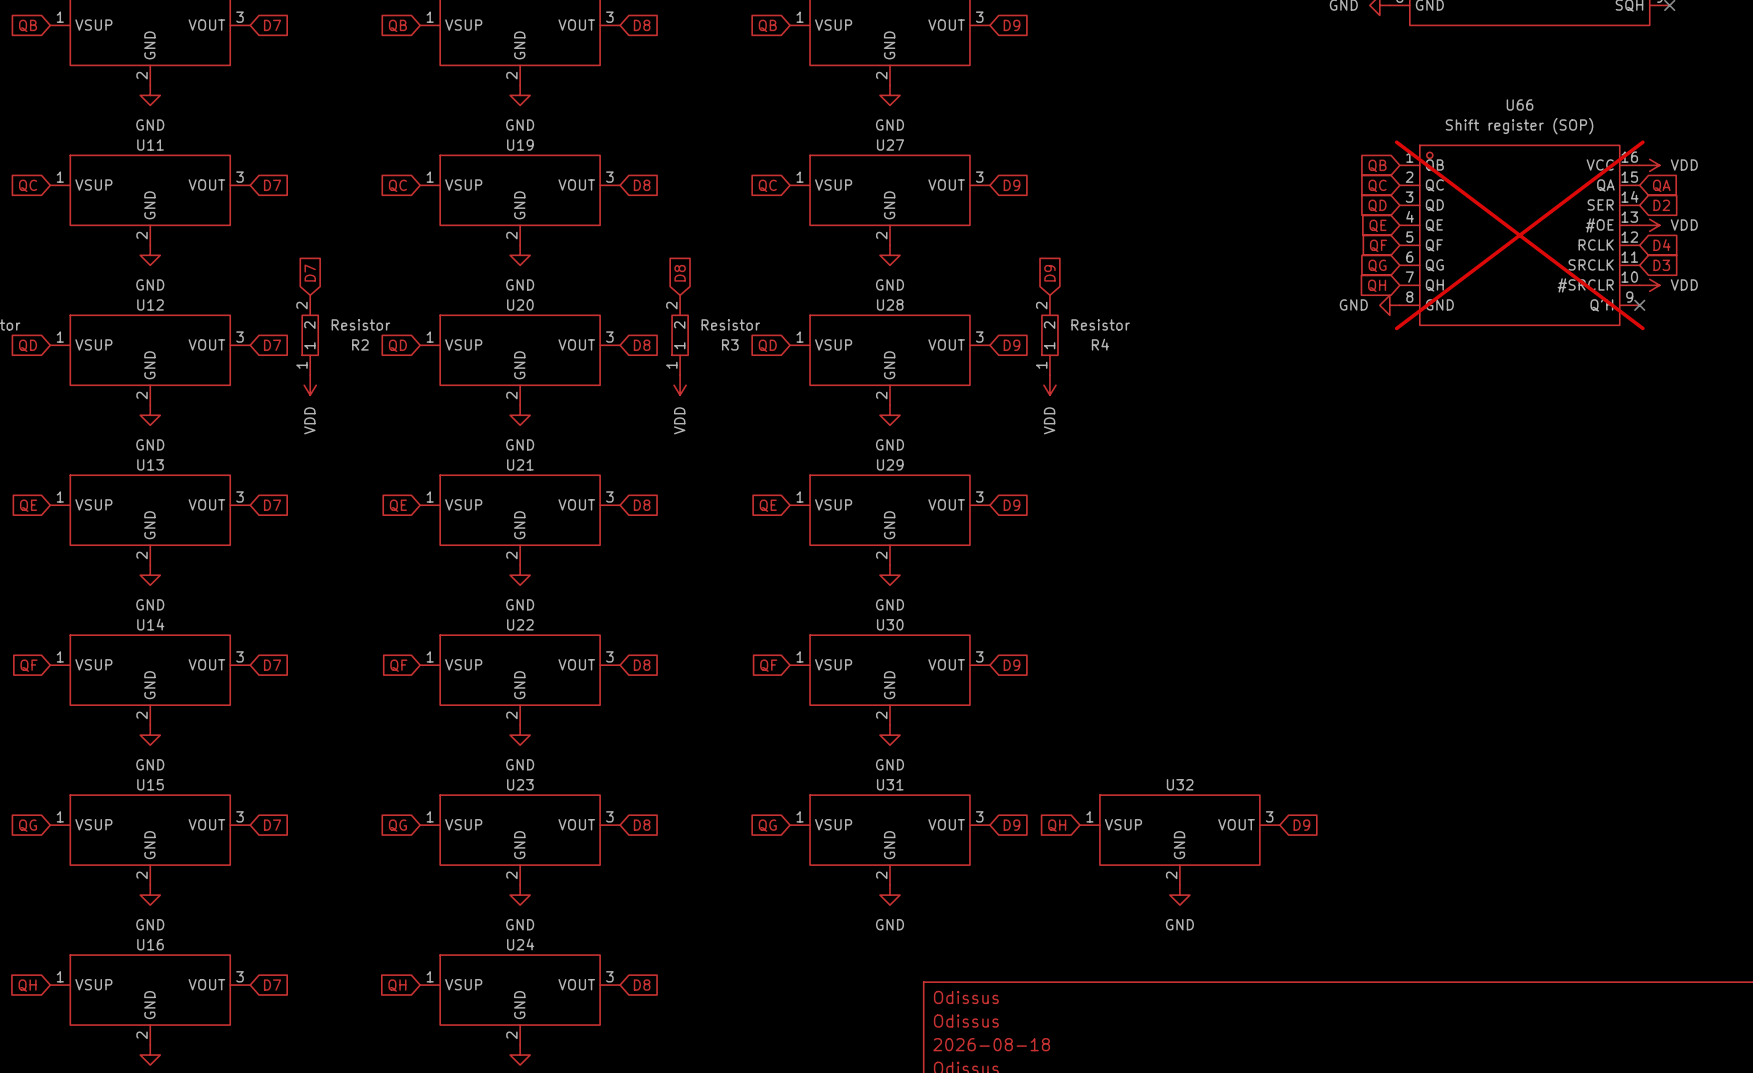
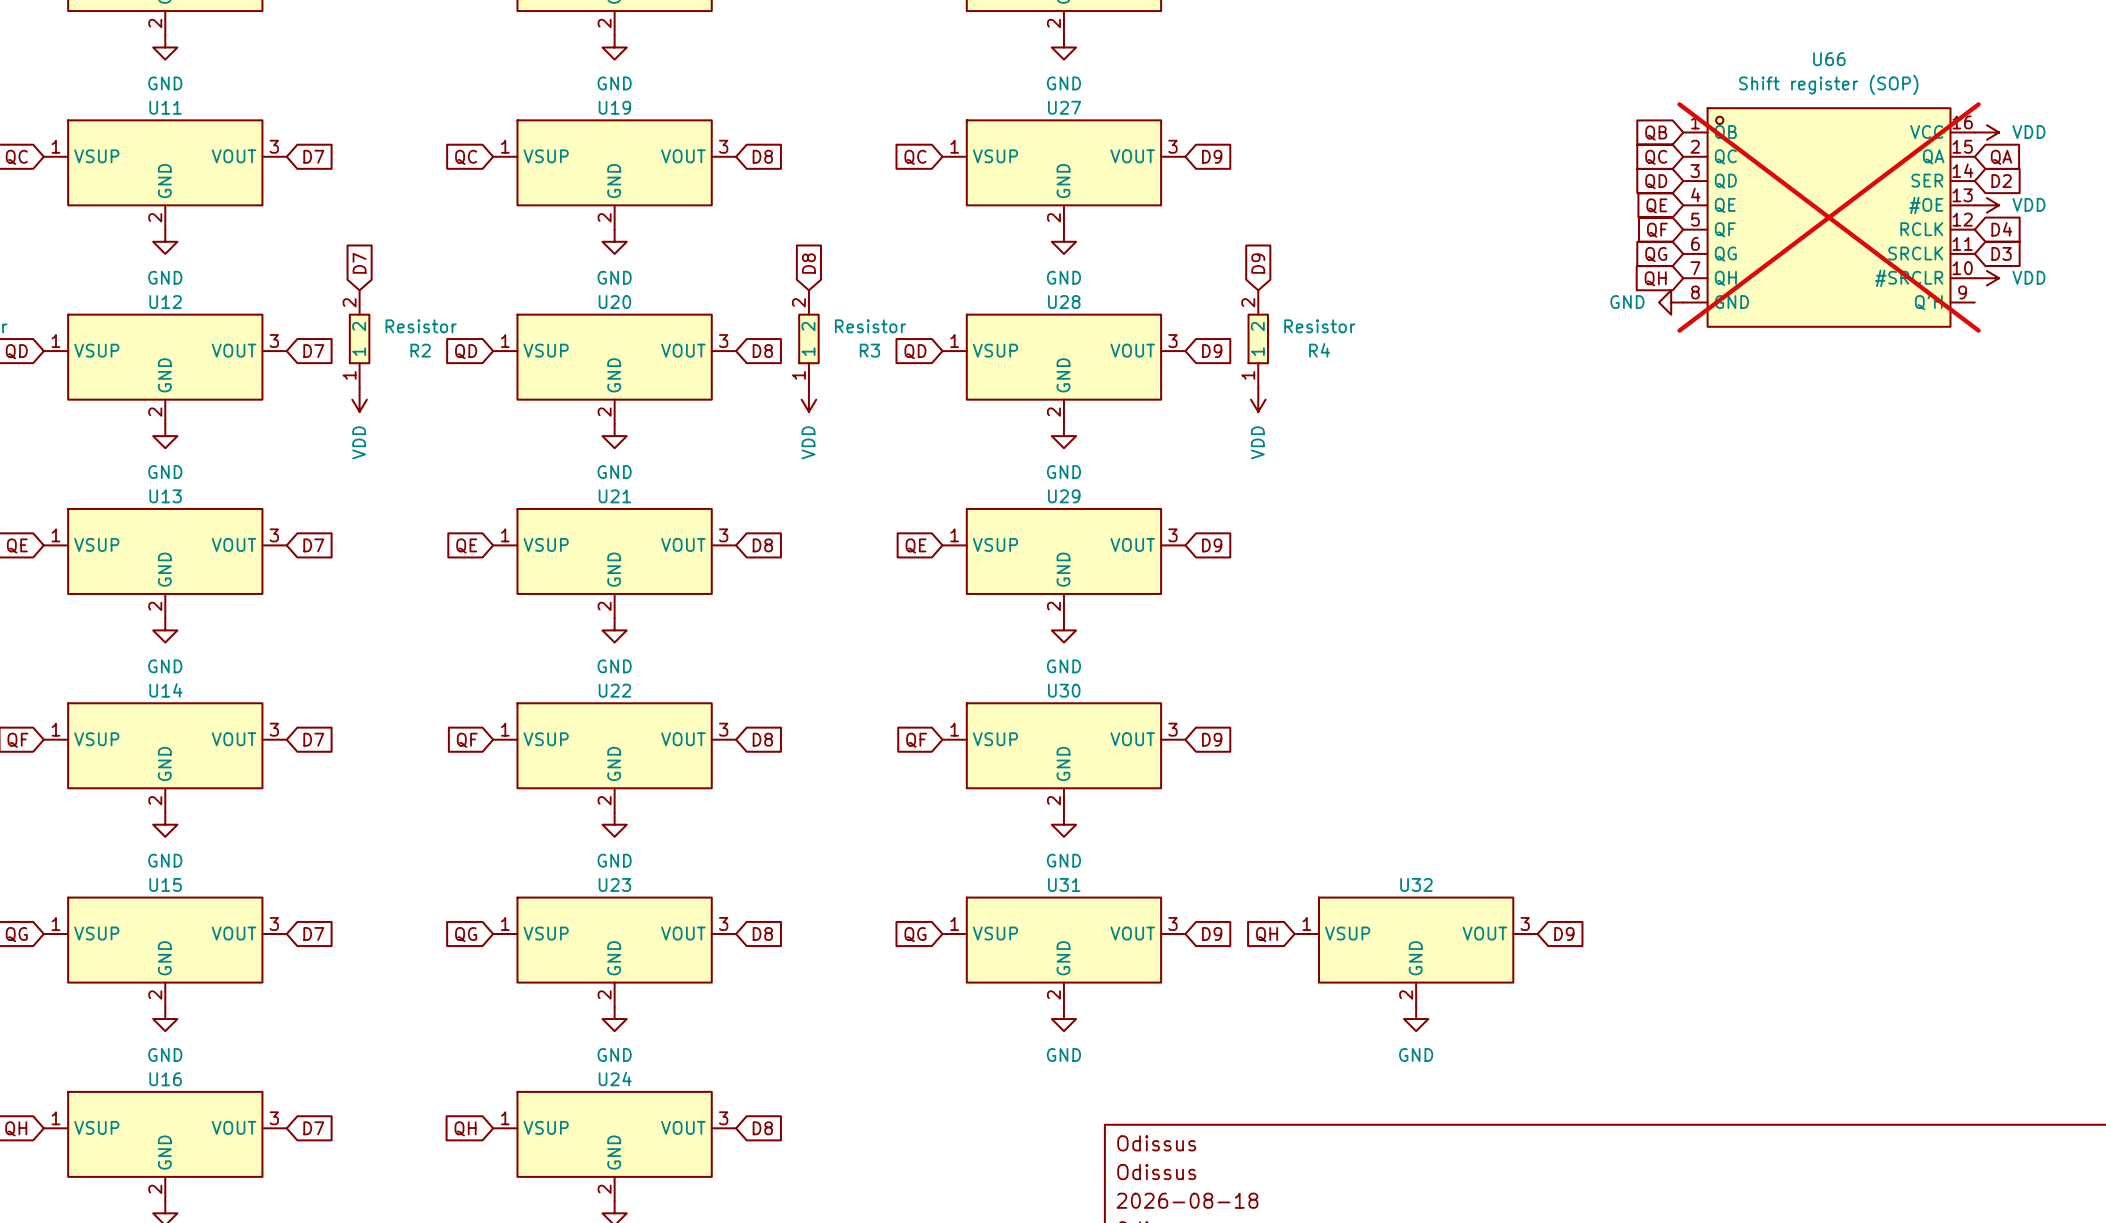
no-connect mark: (1639, 305) -> none

